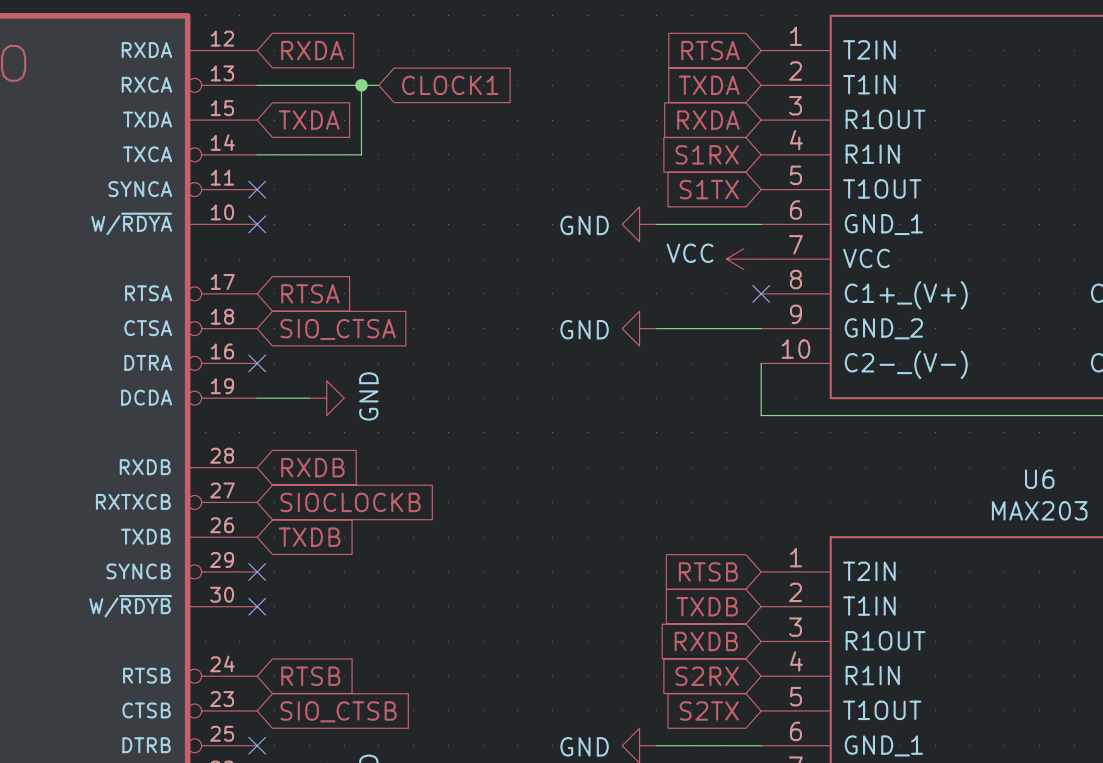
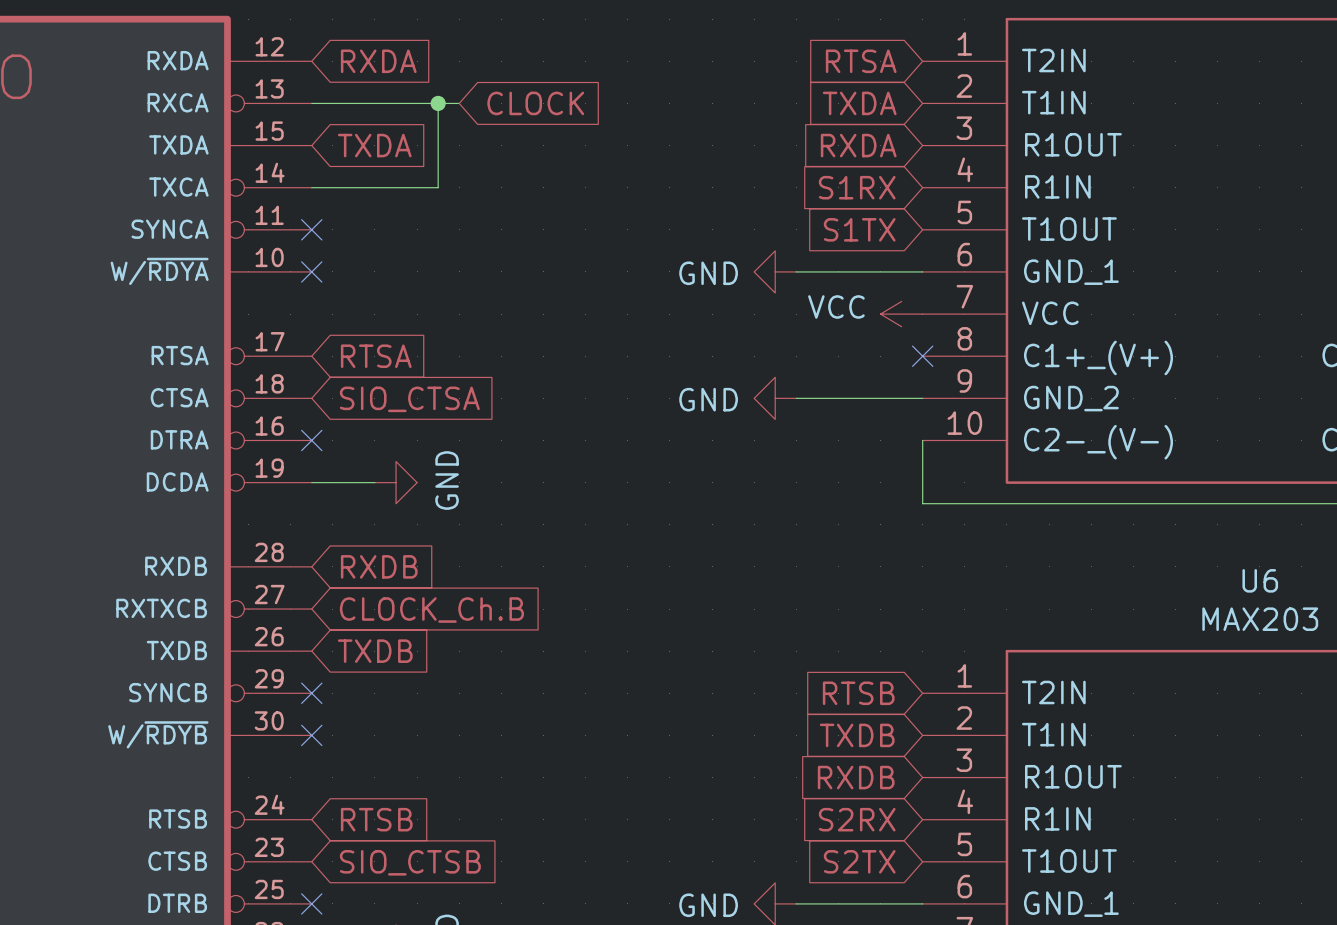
global label: CLOCK1 (450, 85) -> CLOCK (535, 103)
global label: SIOCLOCKB (350, 502) -> CLOCK_Ch.B (431, 610)

